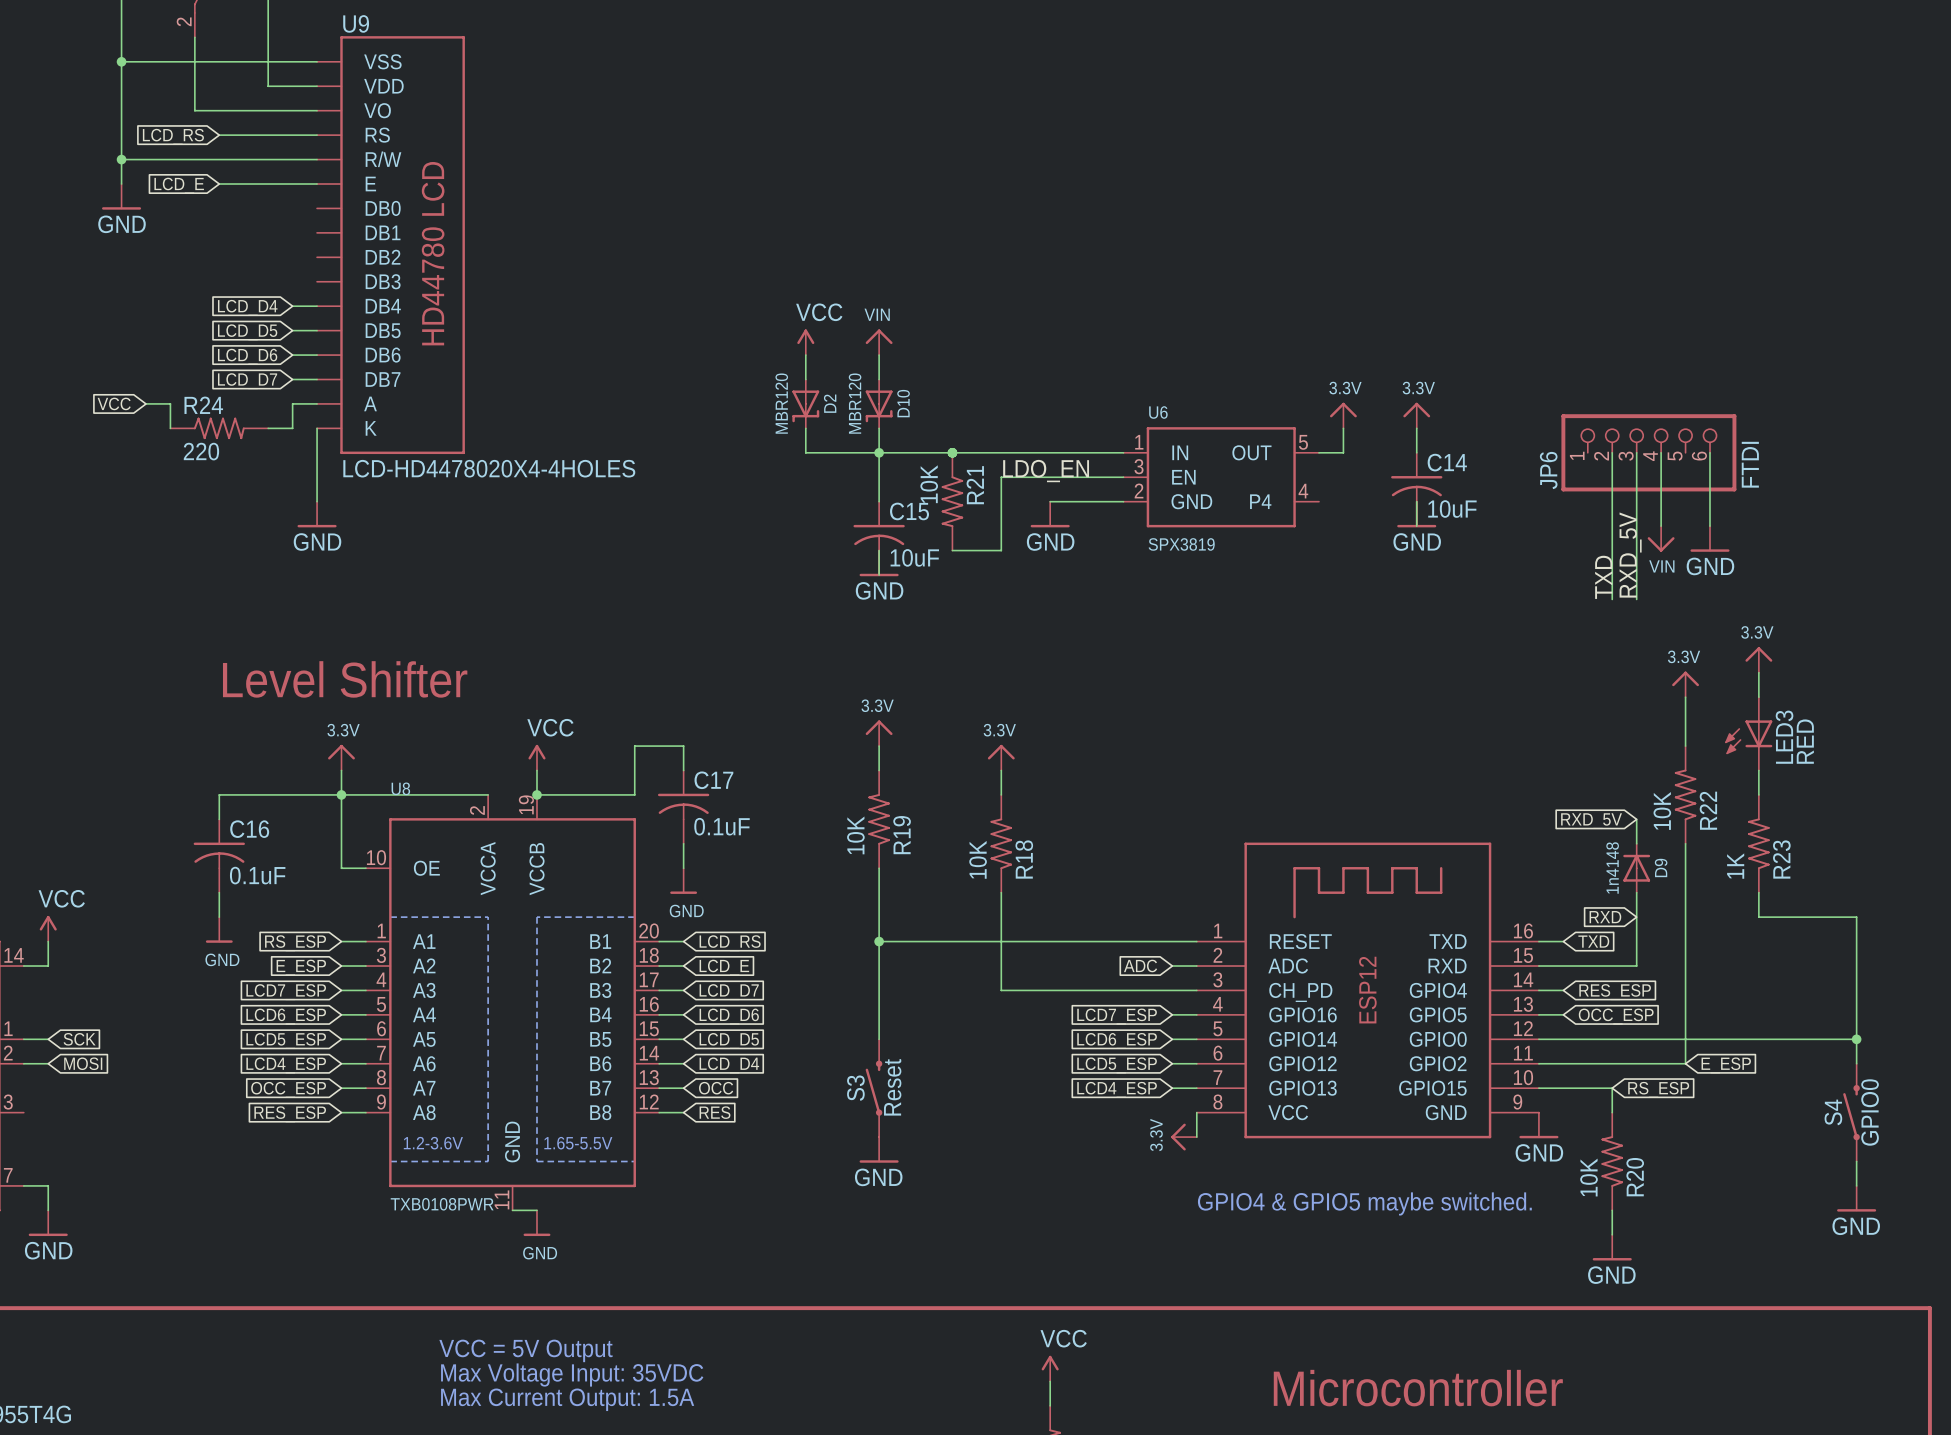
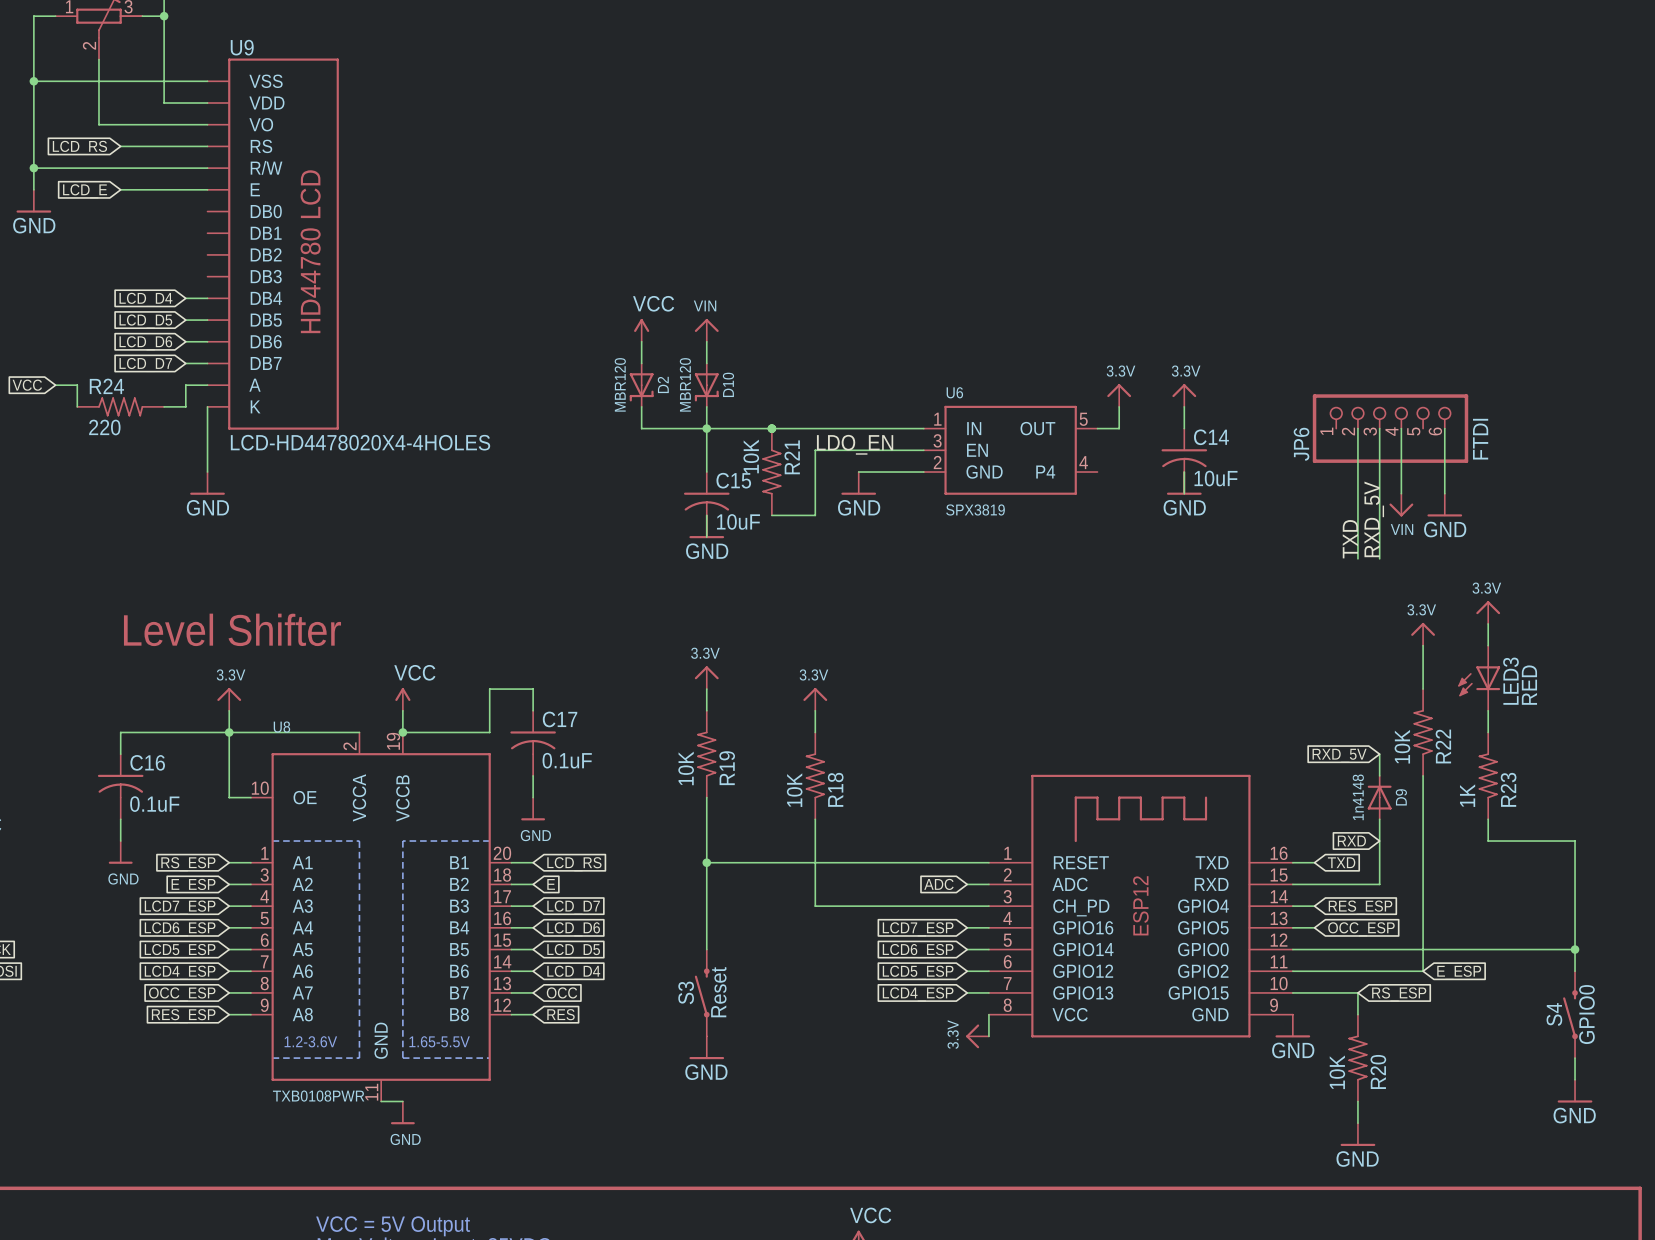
global label: LCD_E (724, 967) -> E (551, 884)
text: GPIO4 & GPIO5 maybe switched. (1364, 1203) -> none

